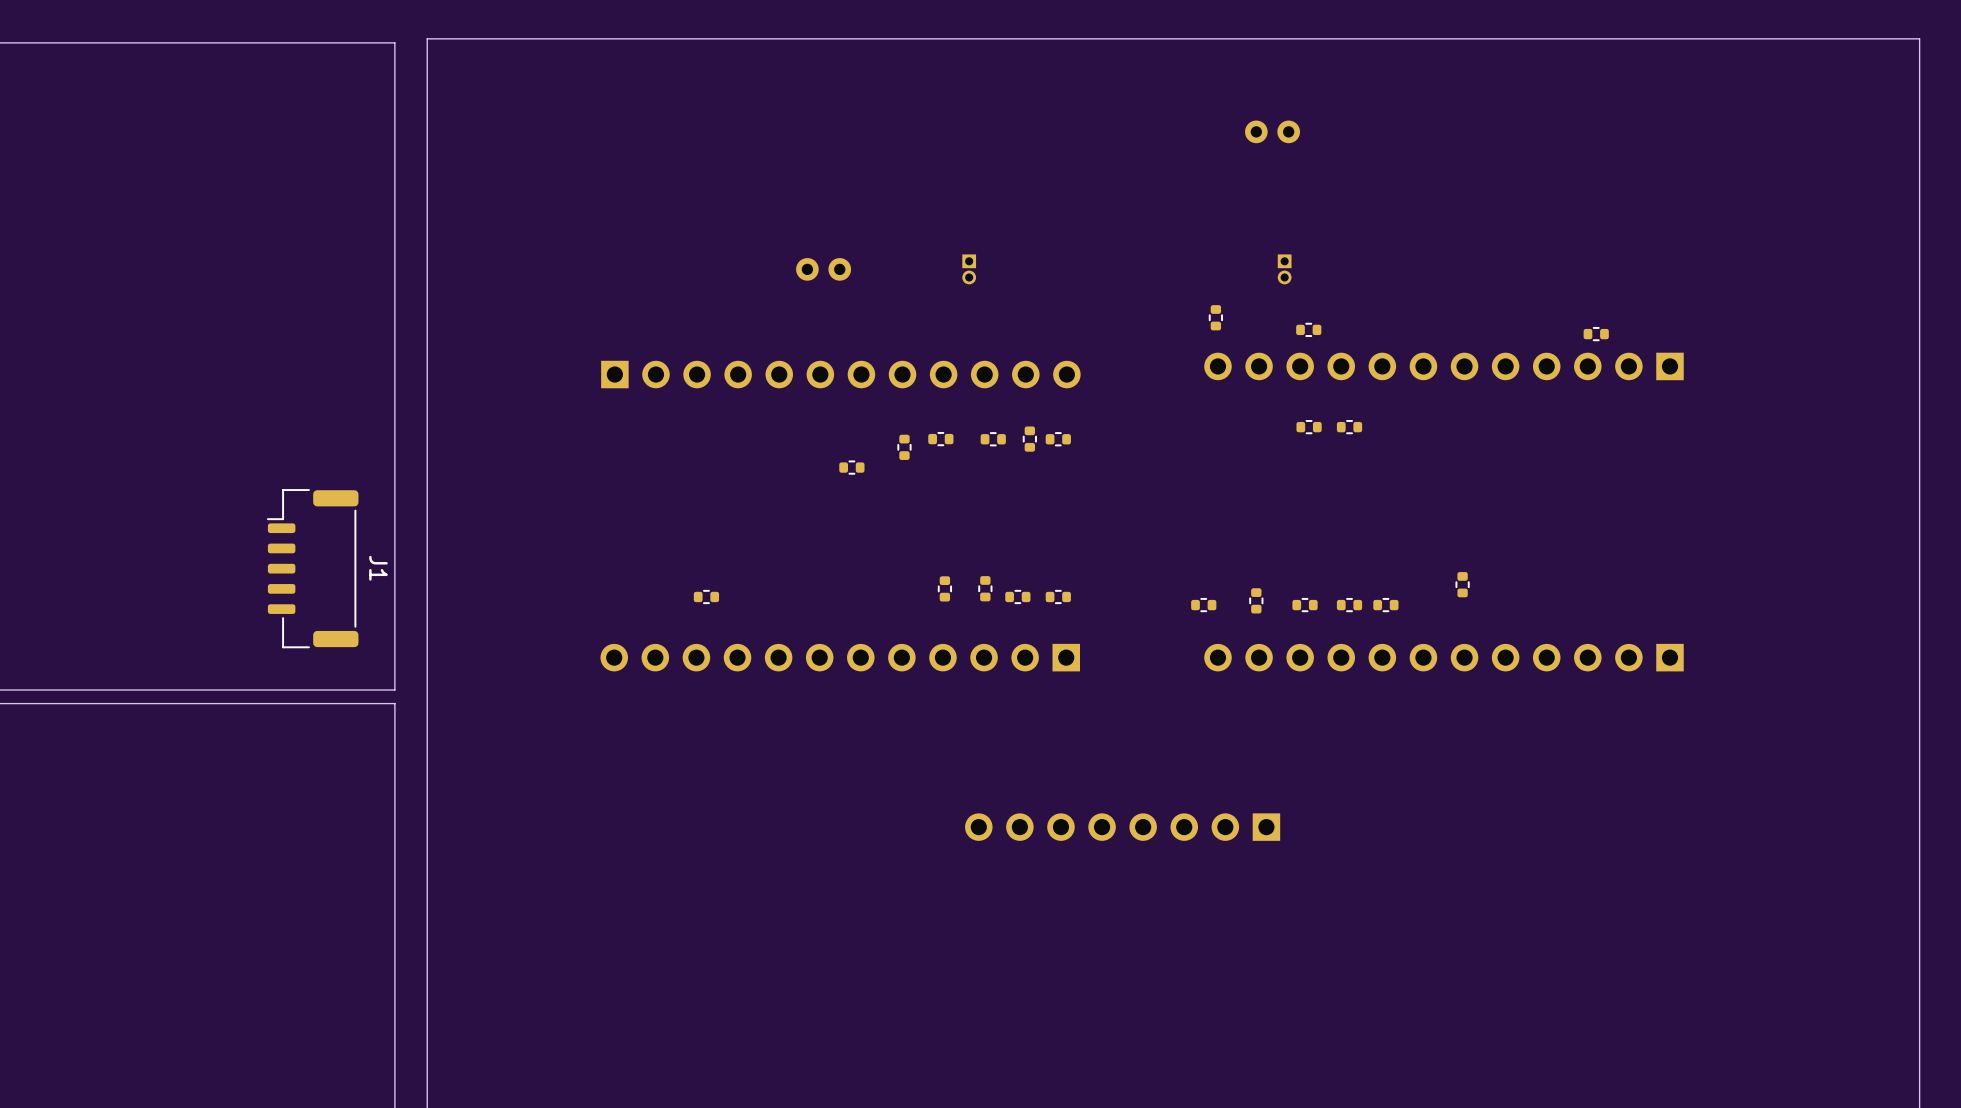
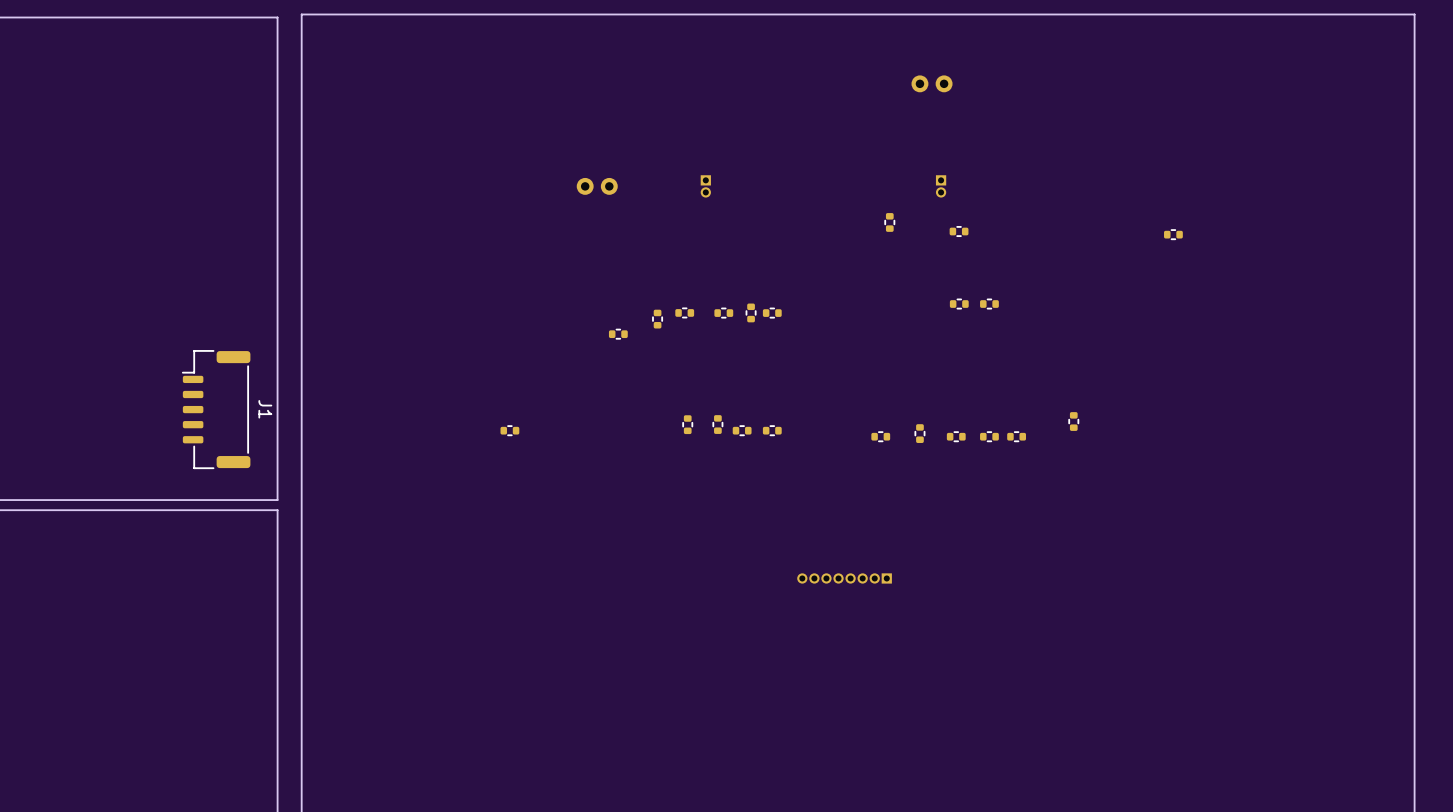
part: (1443, 366) -> none
part: (840, 374) -> none
part: (840, 657) -> none
part: (1443, 657) -> none
part: none -> (844, 578)
part: (1122, 827) -> none

